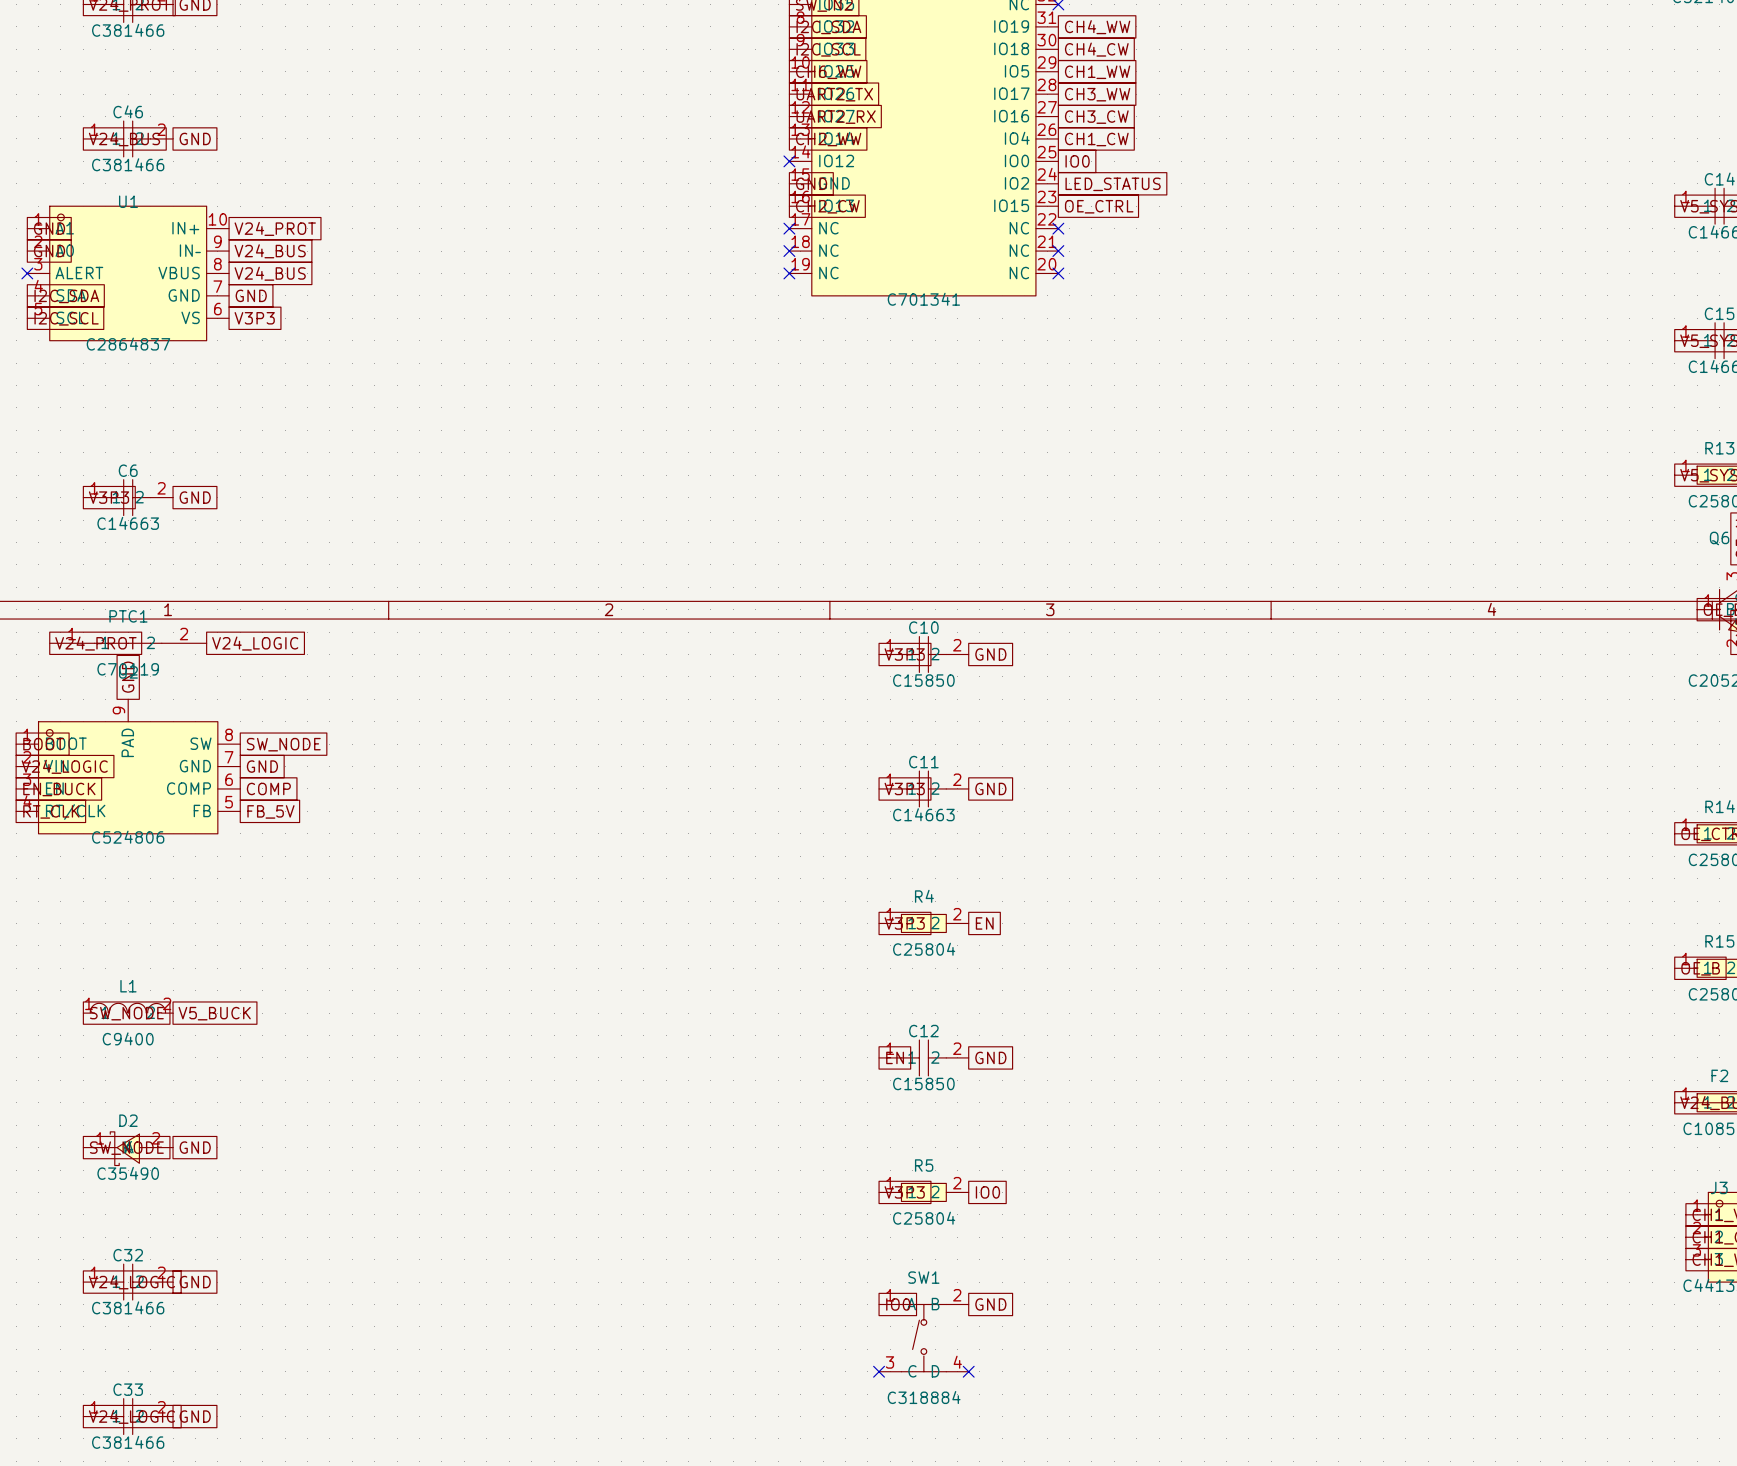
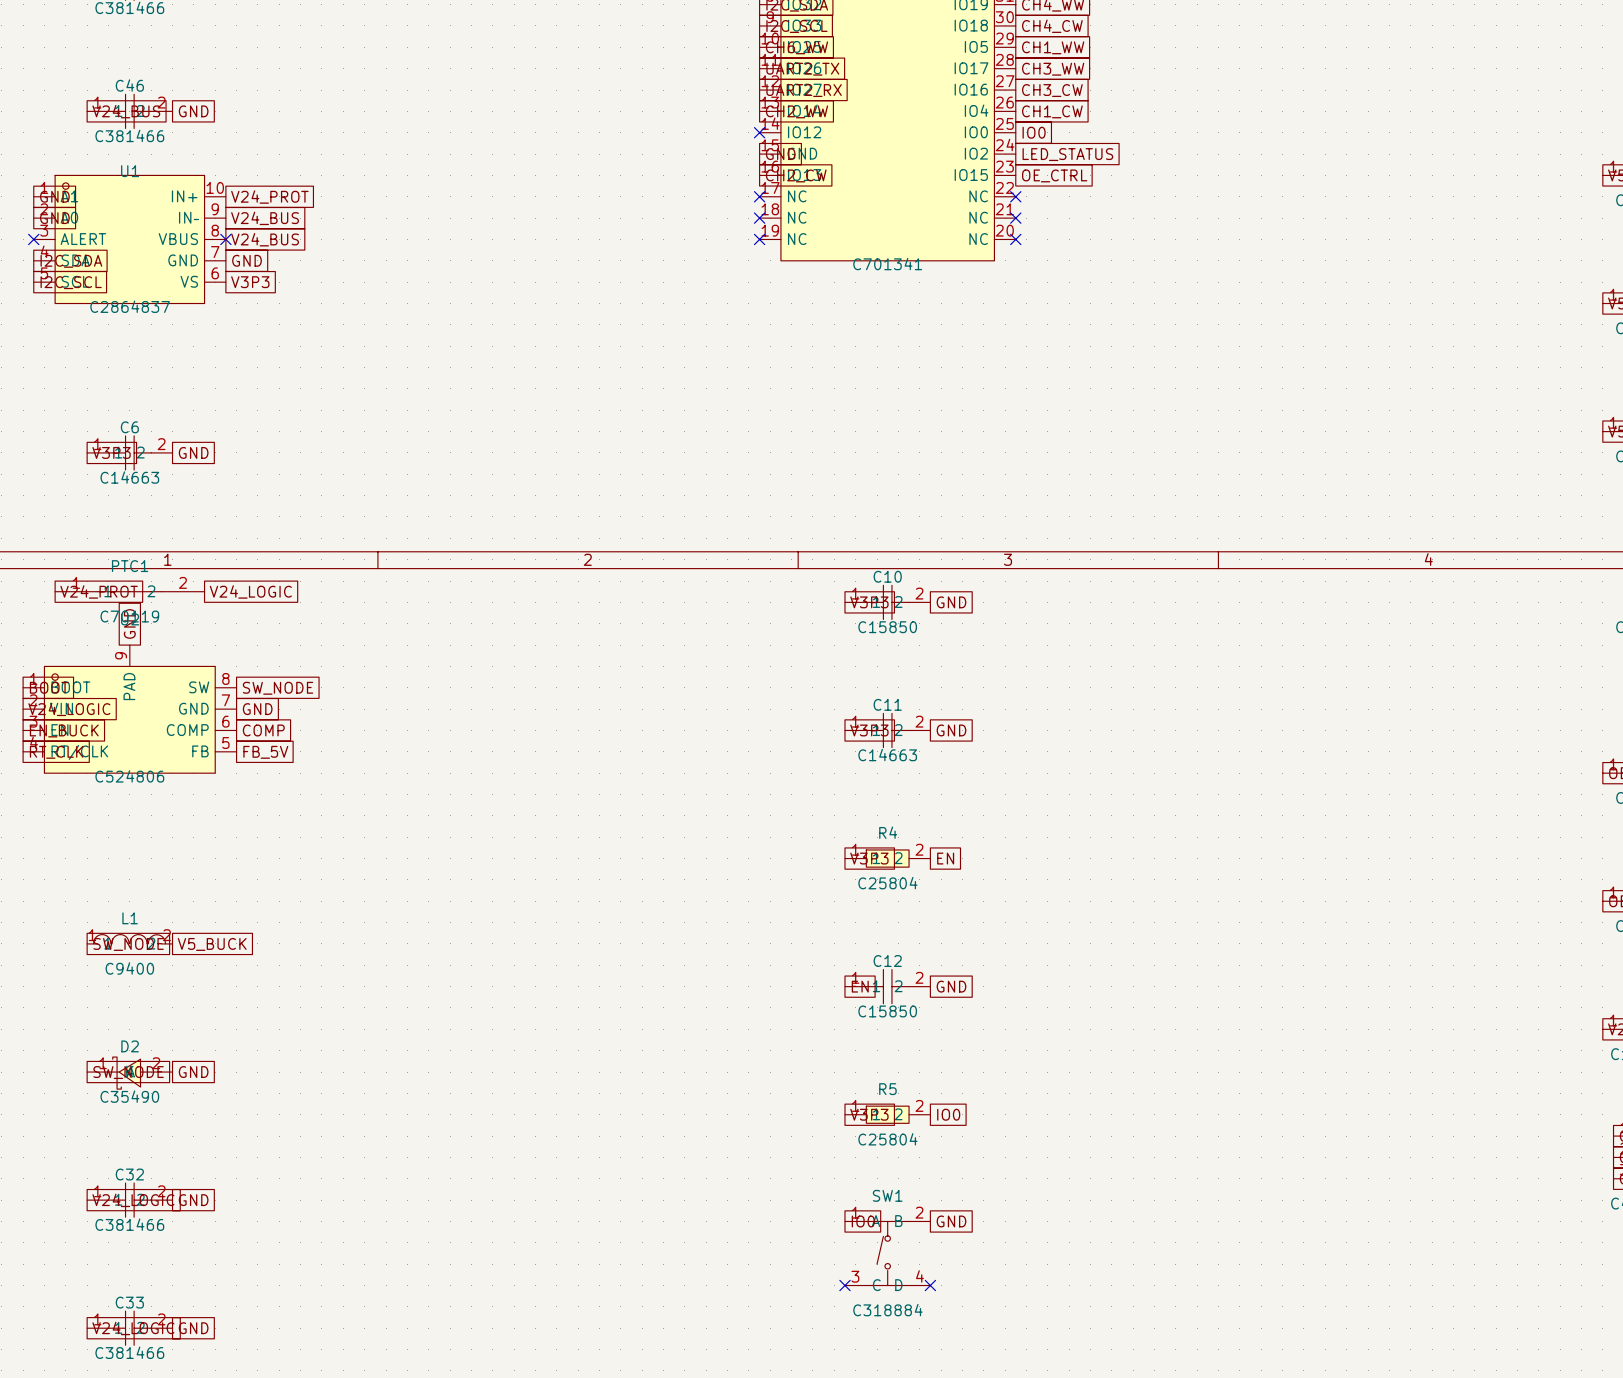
no-connect mark: none -> (225, 239)

